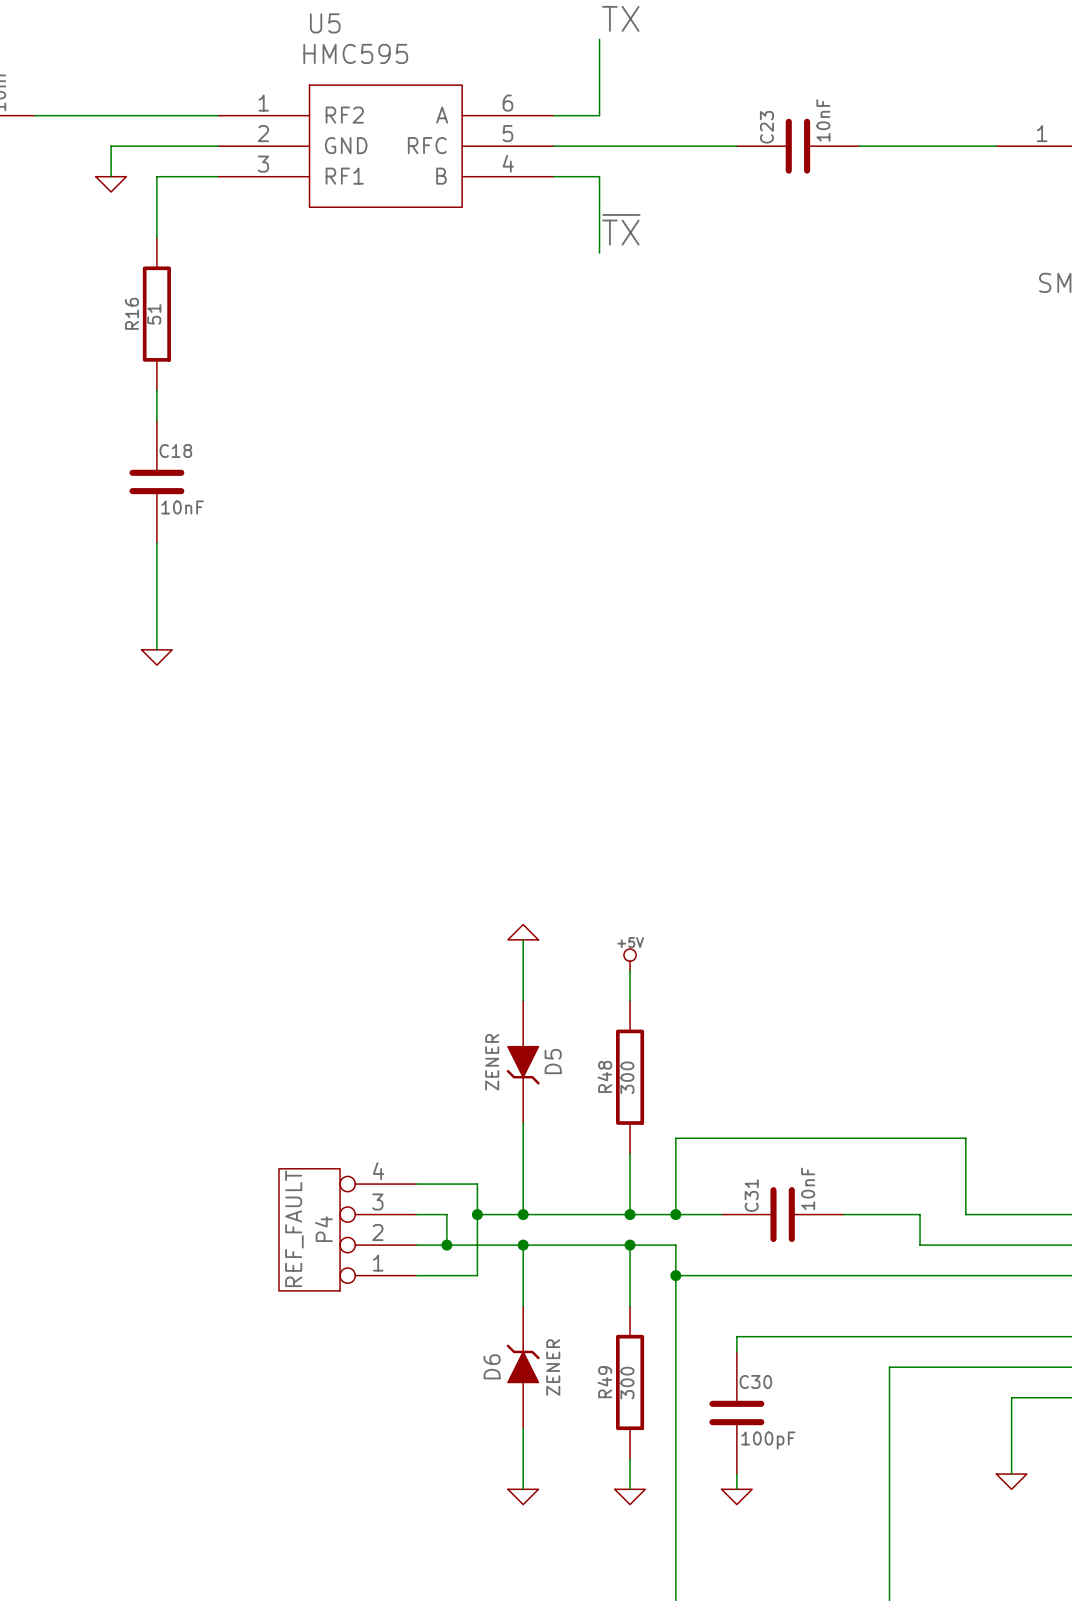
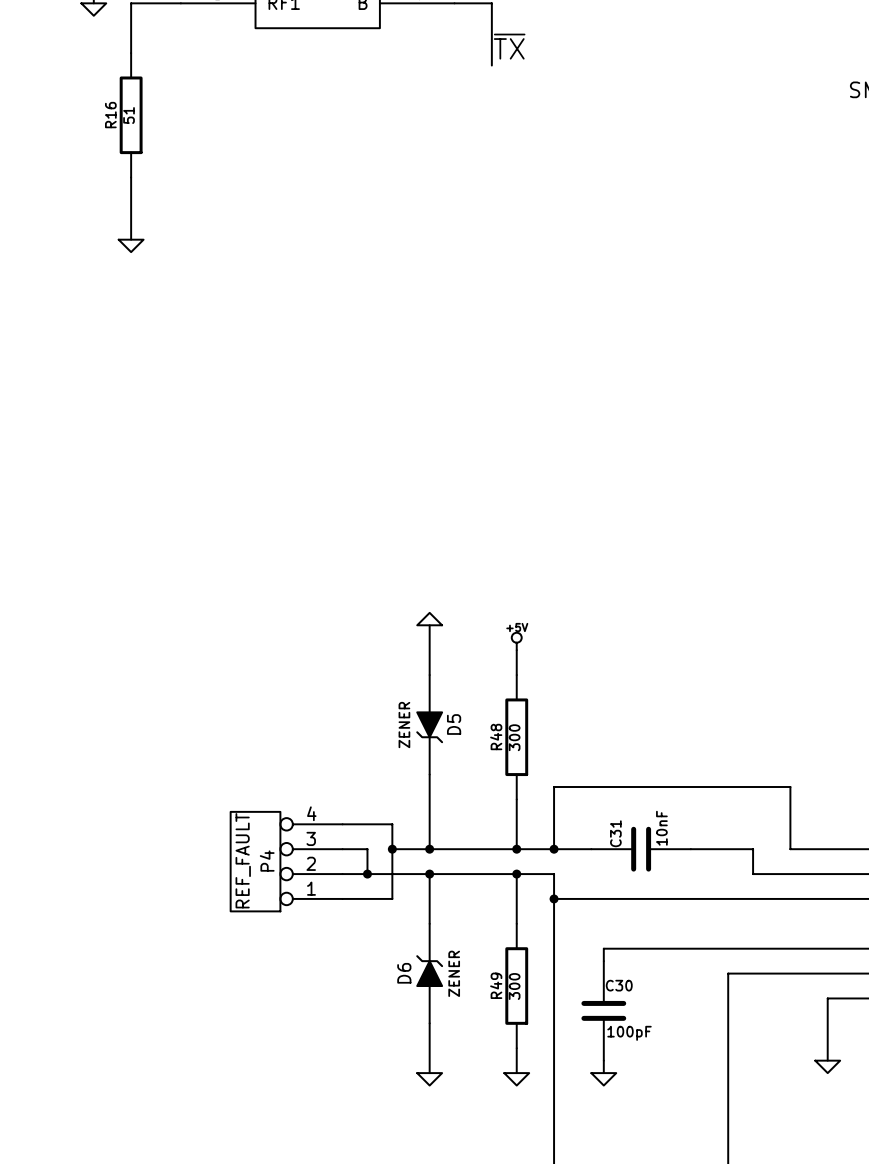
C18: 10nF (156, 481) -> none
wire: (156, 543) (156, 649) -> none
power symbol position: (156, 657) -> (131, 245)

